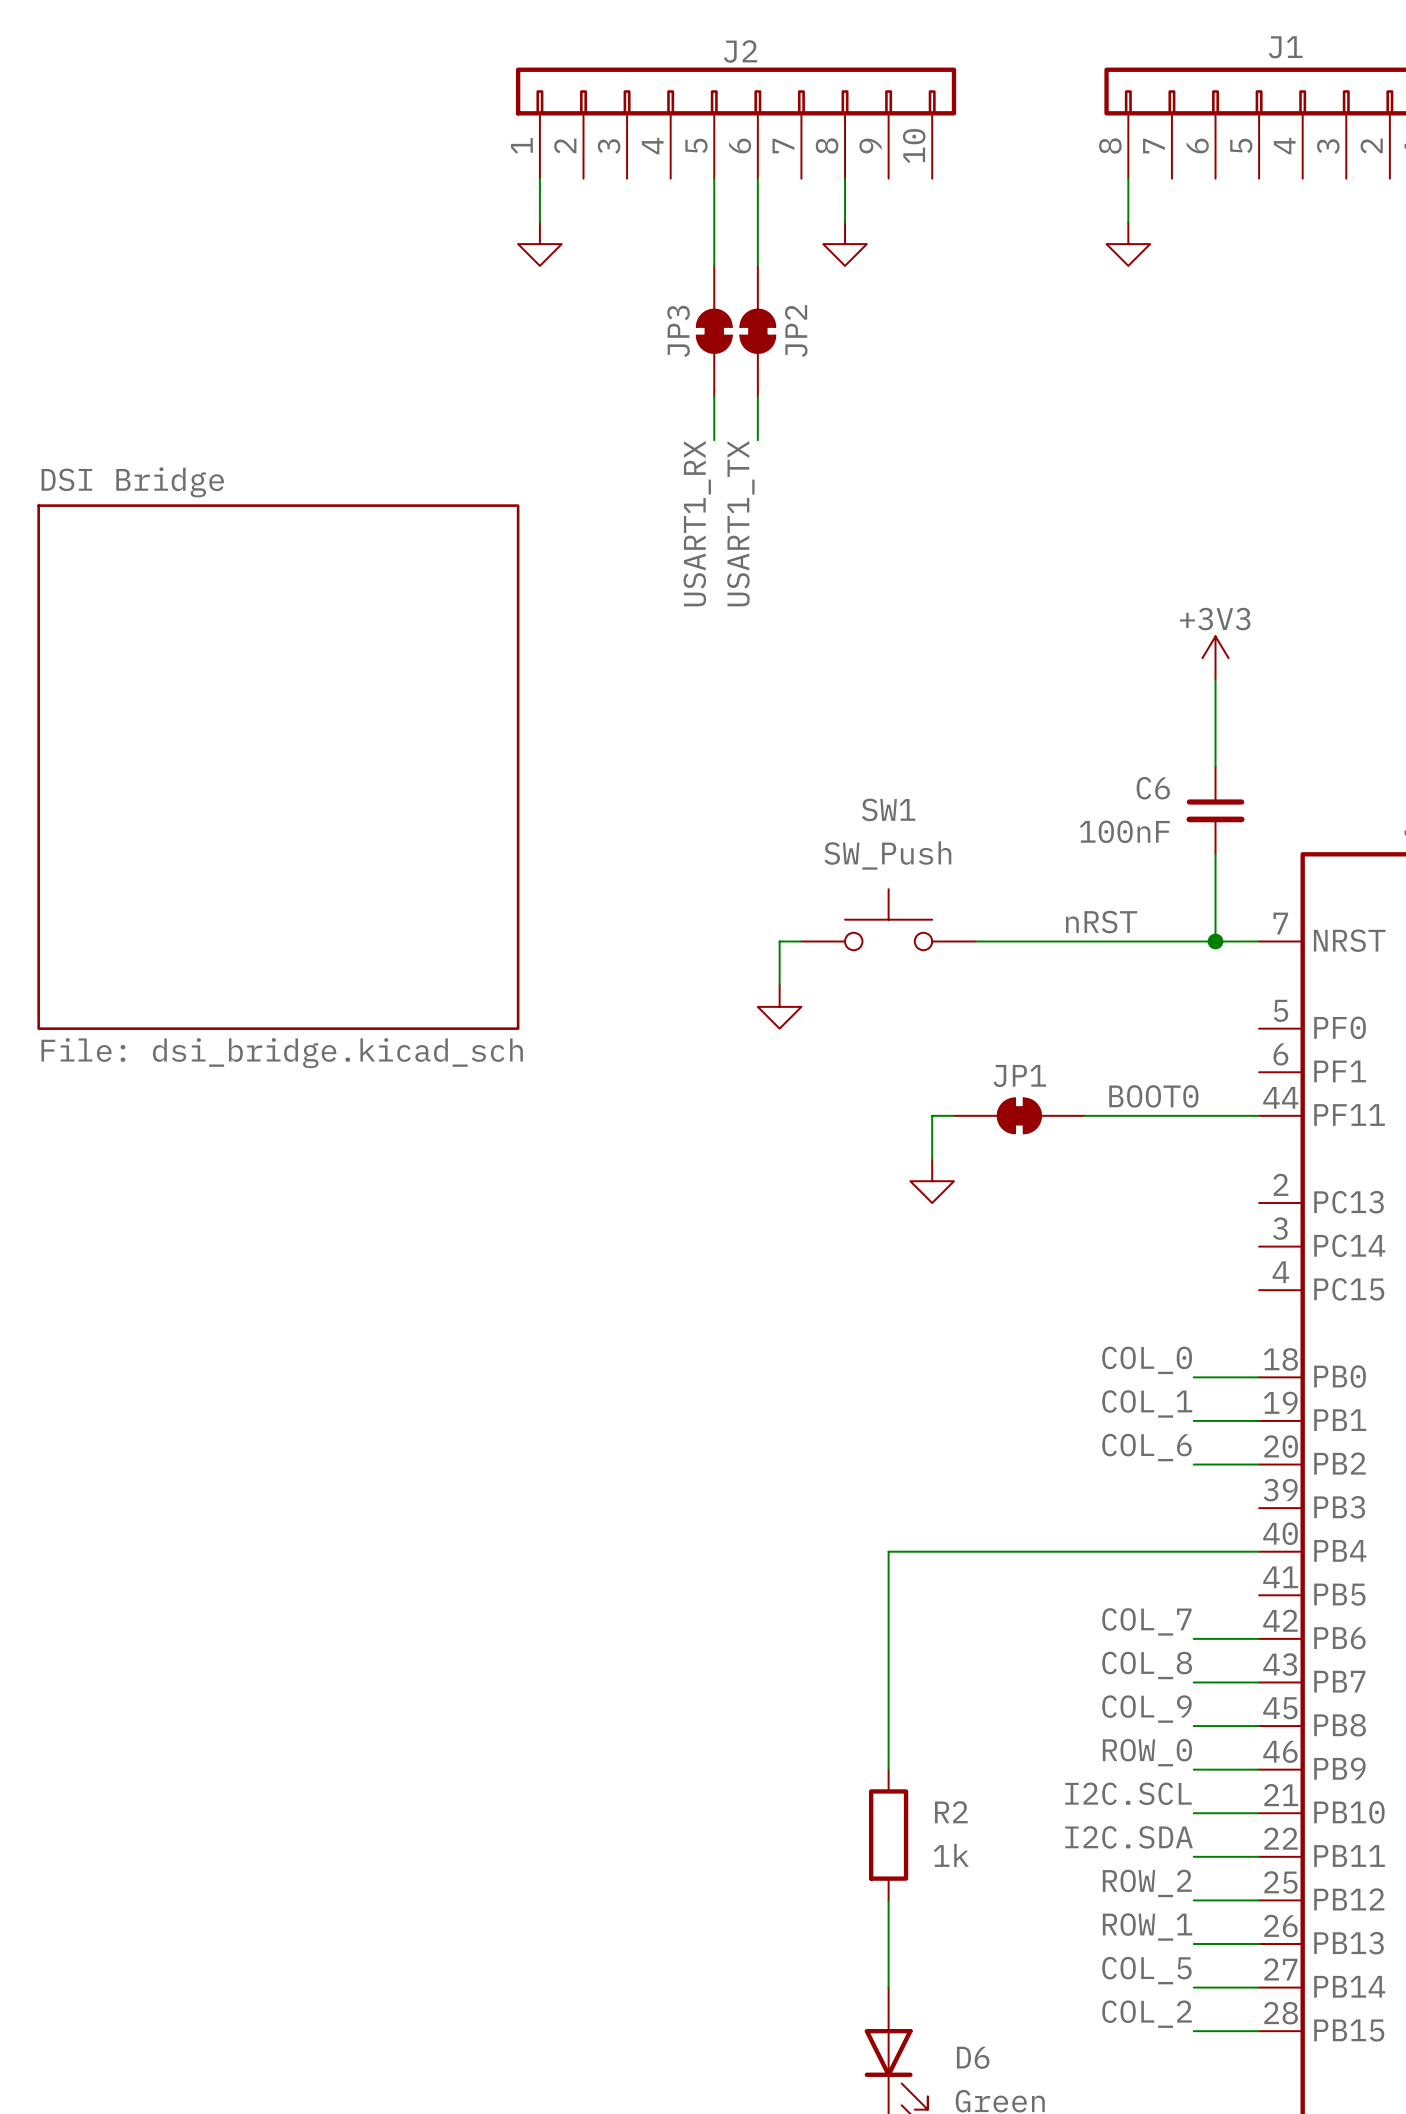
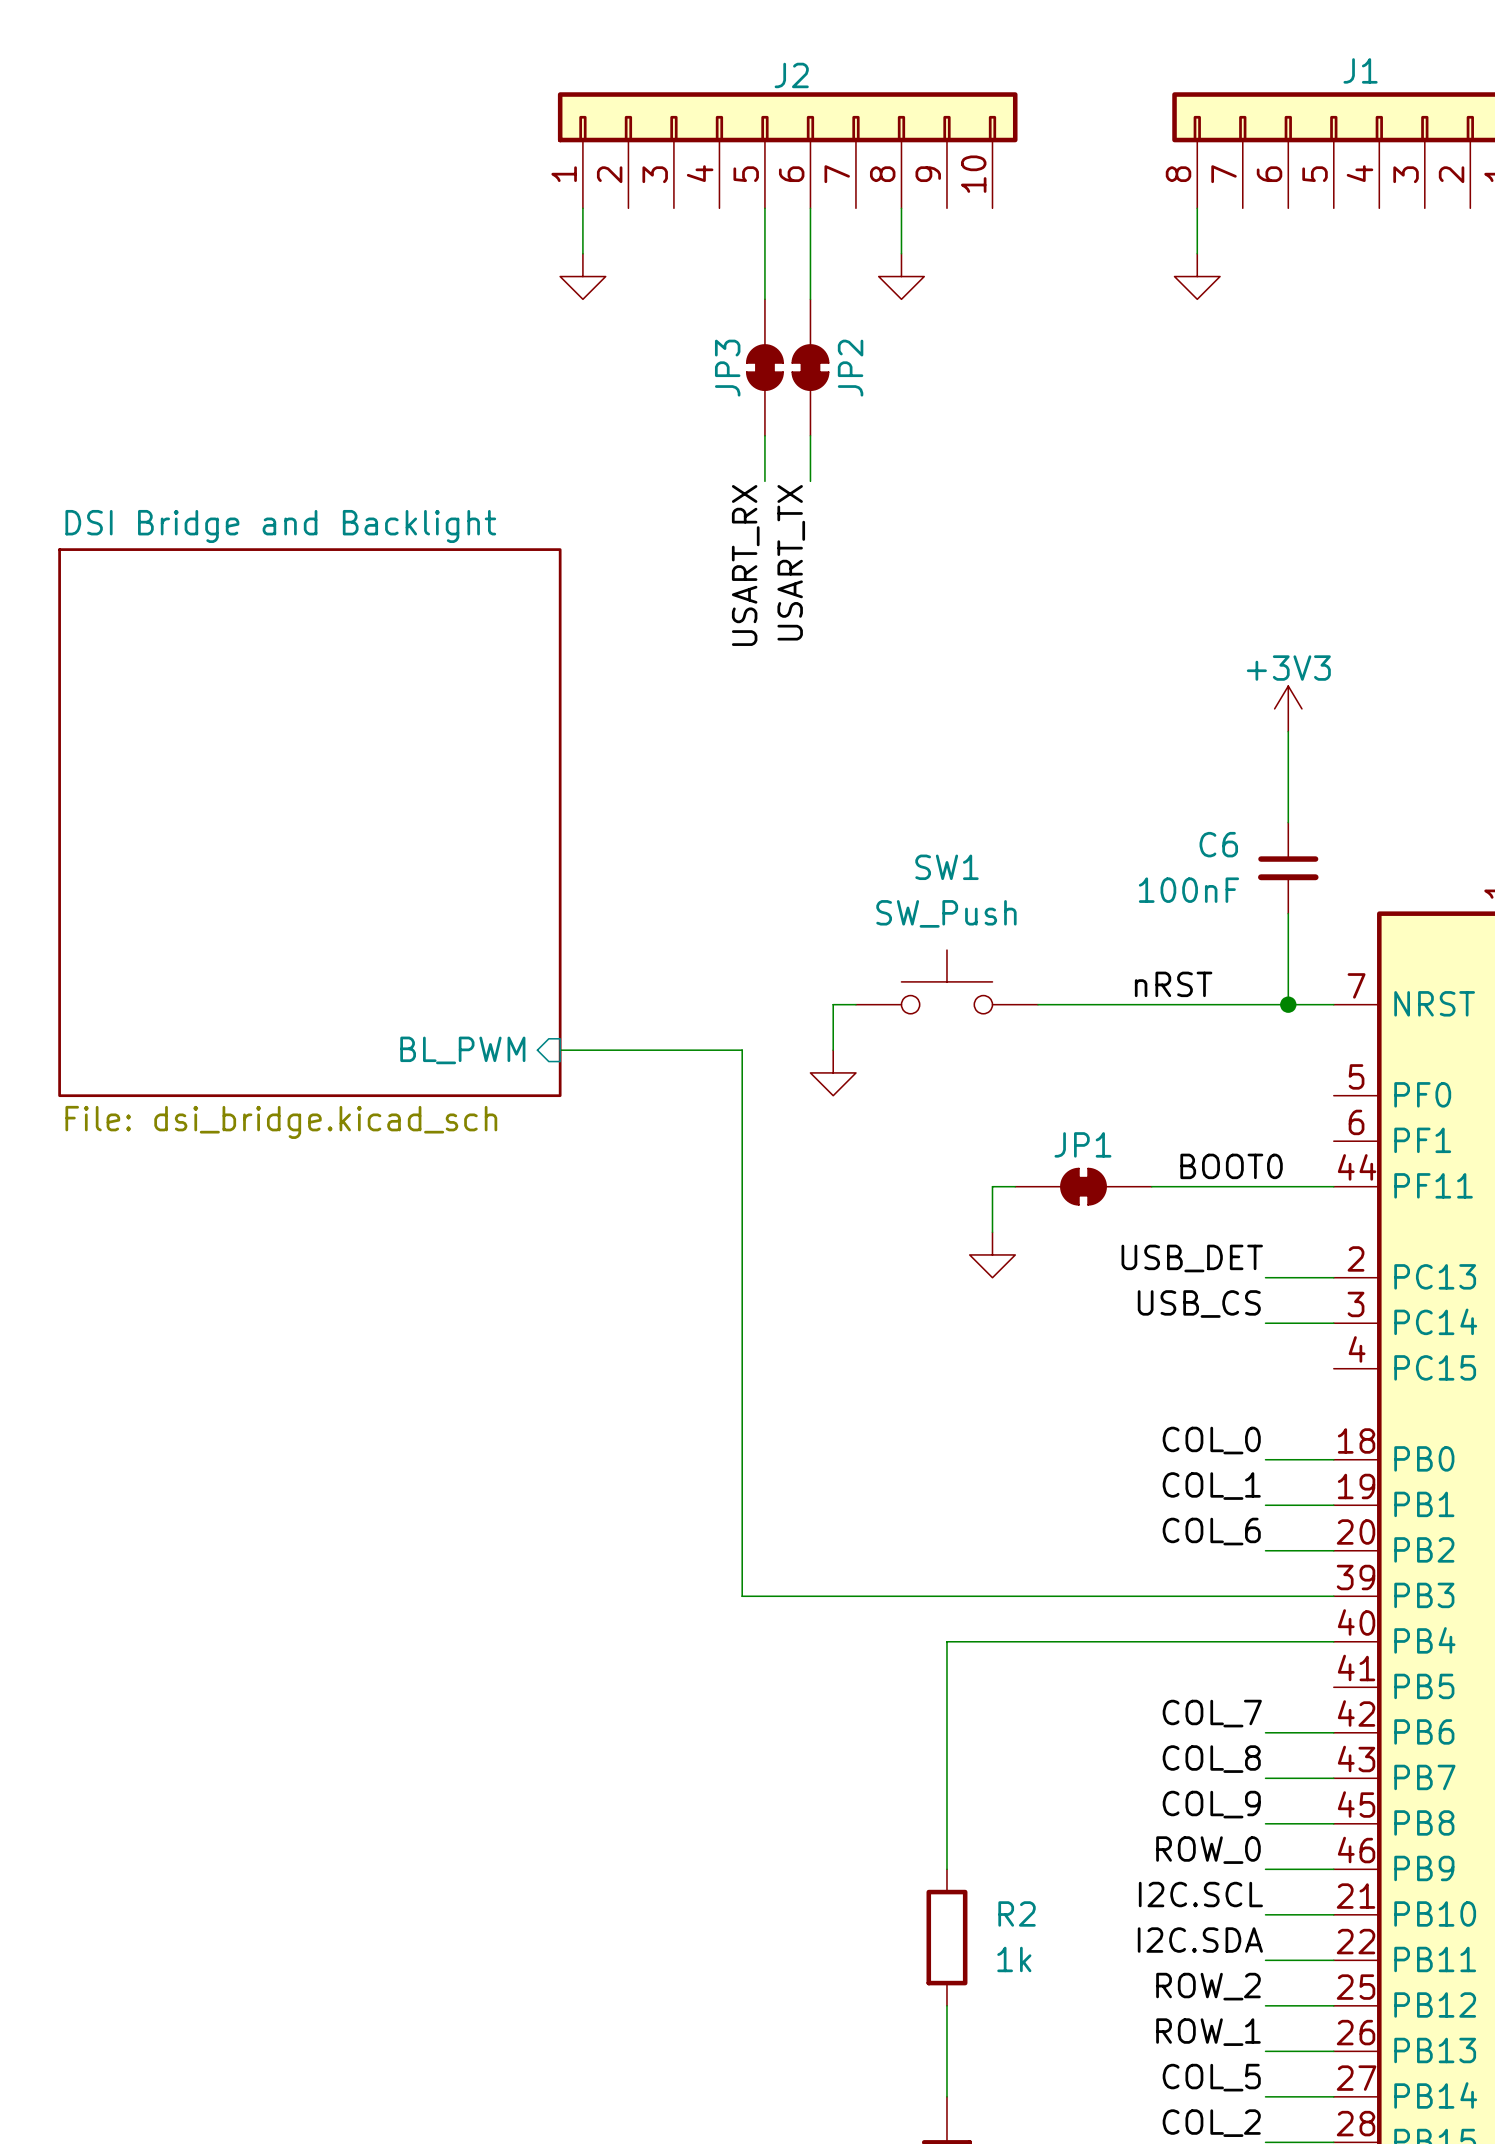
sheet DSI Bridge name: DSI Bridge (132, 482) -> DSI Bridge and Backlight (280, 526)
label: USART1_RX (697, 523) -> USART_RX (745, 565)
label: USART1_TX (740, 523) -> USART_TX (791, 562)
wire: none -> (560, 1050) (742, 1050) (742, 1596) (1333, 1596)
sheet pin: none -> BL_PWM (462, 1050)
label: none -> USB_DET (1192, 1258)
wire: none -> (1265, 1277) (1333, 1277)
label: none -> USB_CS (1199, 1304)
wire: none -> (1265, 1323) (1333, 1323)

